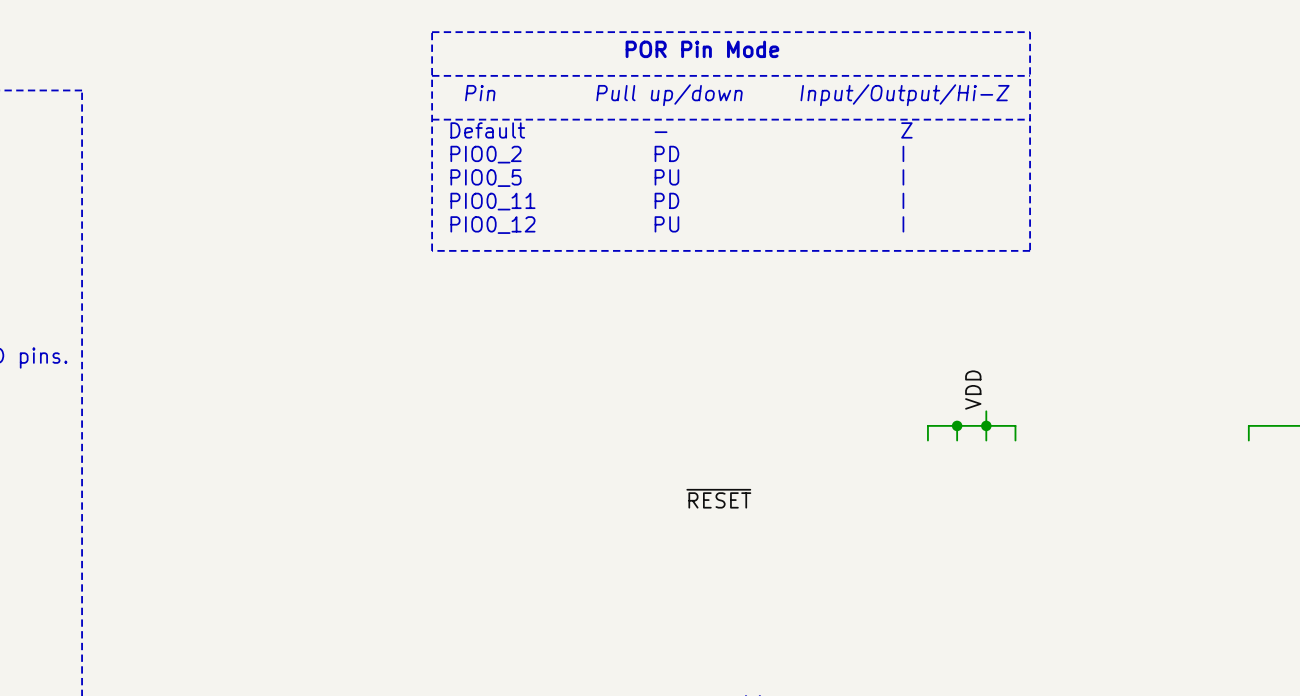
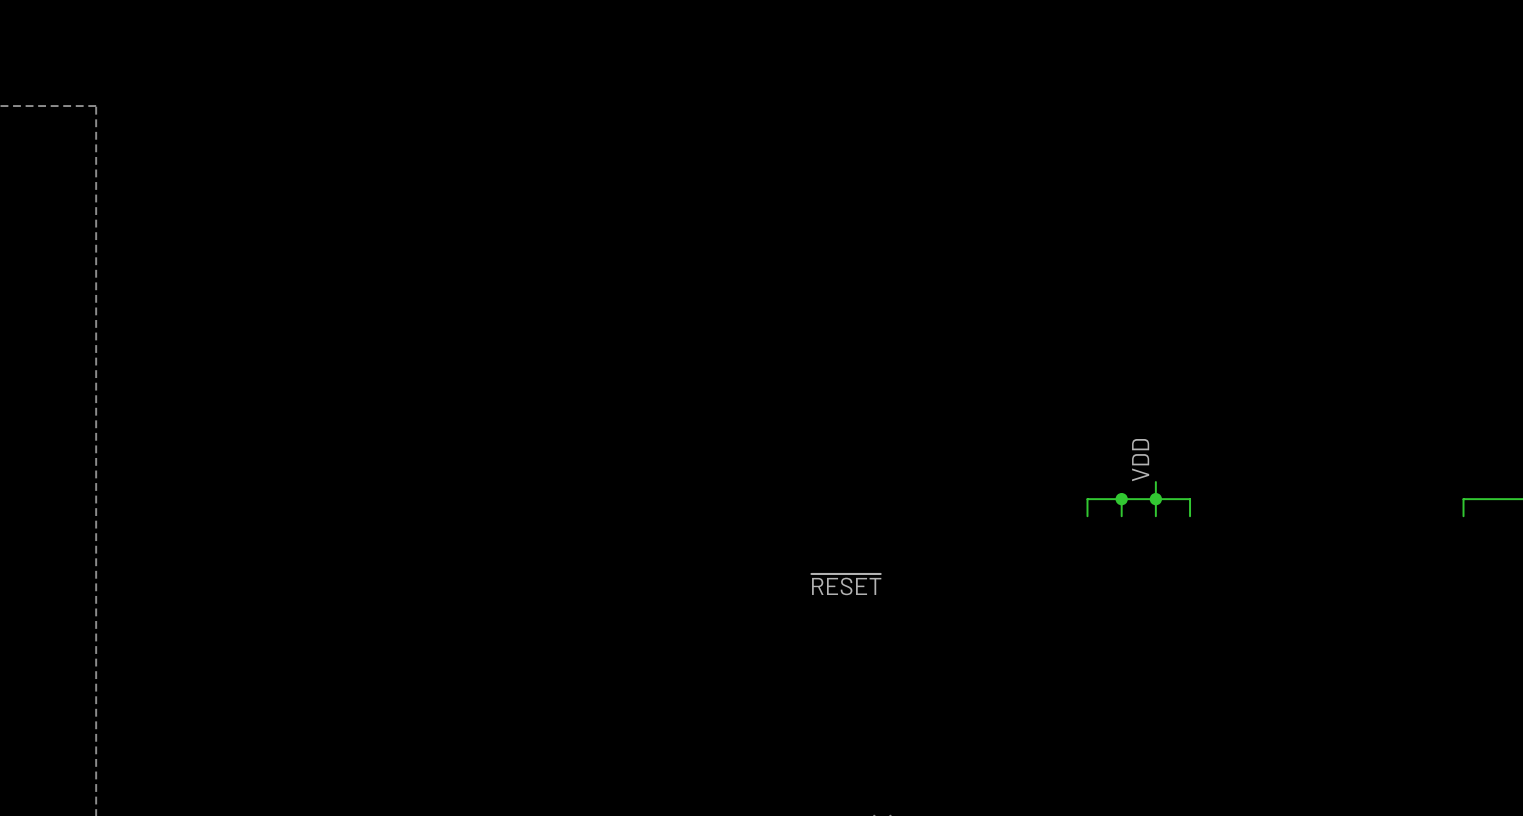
line: (432, 32) (1030, 32) (1030, 250) (432, 250) (432, 32) -> none
text: POR Pin Mode (702, 49) -> none
line: (432, 75) (1030, 75) -> none
text: Pin (480, 93) -> none
text: Pull up/down (669, 95) -> none
text: Input/Output/Hi-Z (905, 95) -> none
line: (432, 119) (1030, 119) -> none
text: Default (487, 130) -> none
text: Z (906, 130) -> none
text: - (661, 132) -> none
text: PD (666, 153) -> none
text: I (903, 153) -> none
text: PIO0_2 (486, 154) -> none
text: PU (666, 177) -> none
text: I (903, 177) -> none
text: PIO0_5 (486, 178) -> none
text: PD (666, 200) -> none
text: I (903, 200) -> none
text: PIO0_11 (492, 201) -> none
text: PU (666, 224) -> none
text: I (903, 224) -> none
text: PIO0_12 (492, 225) -> none

